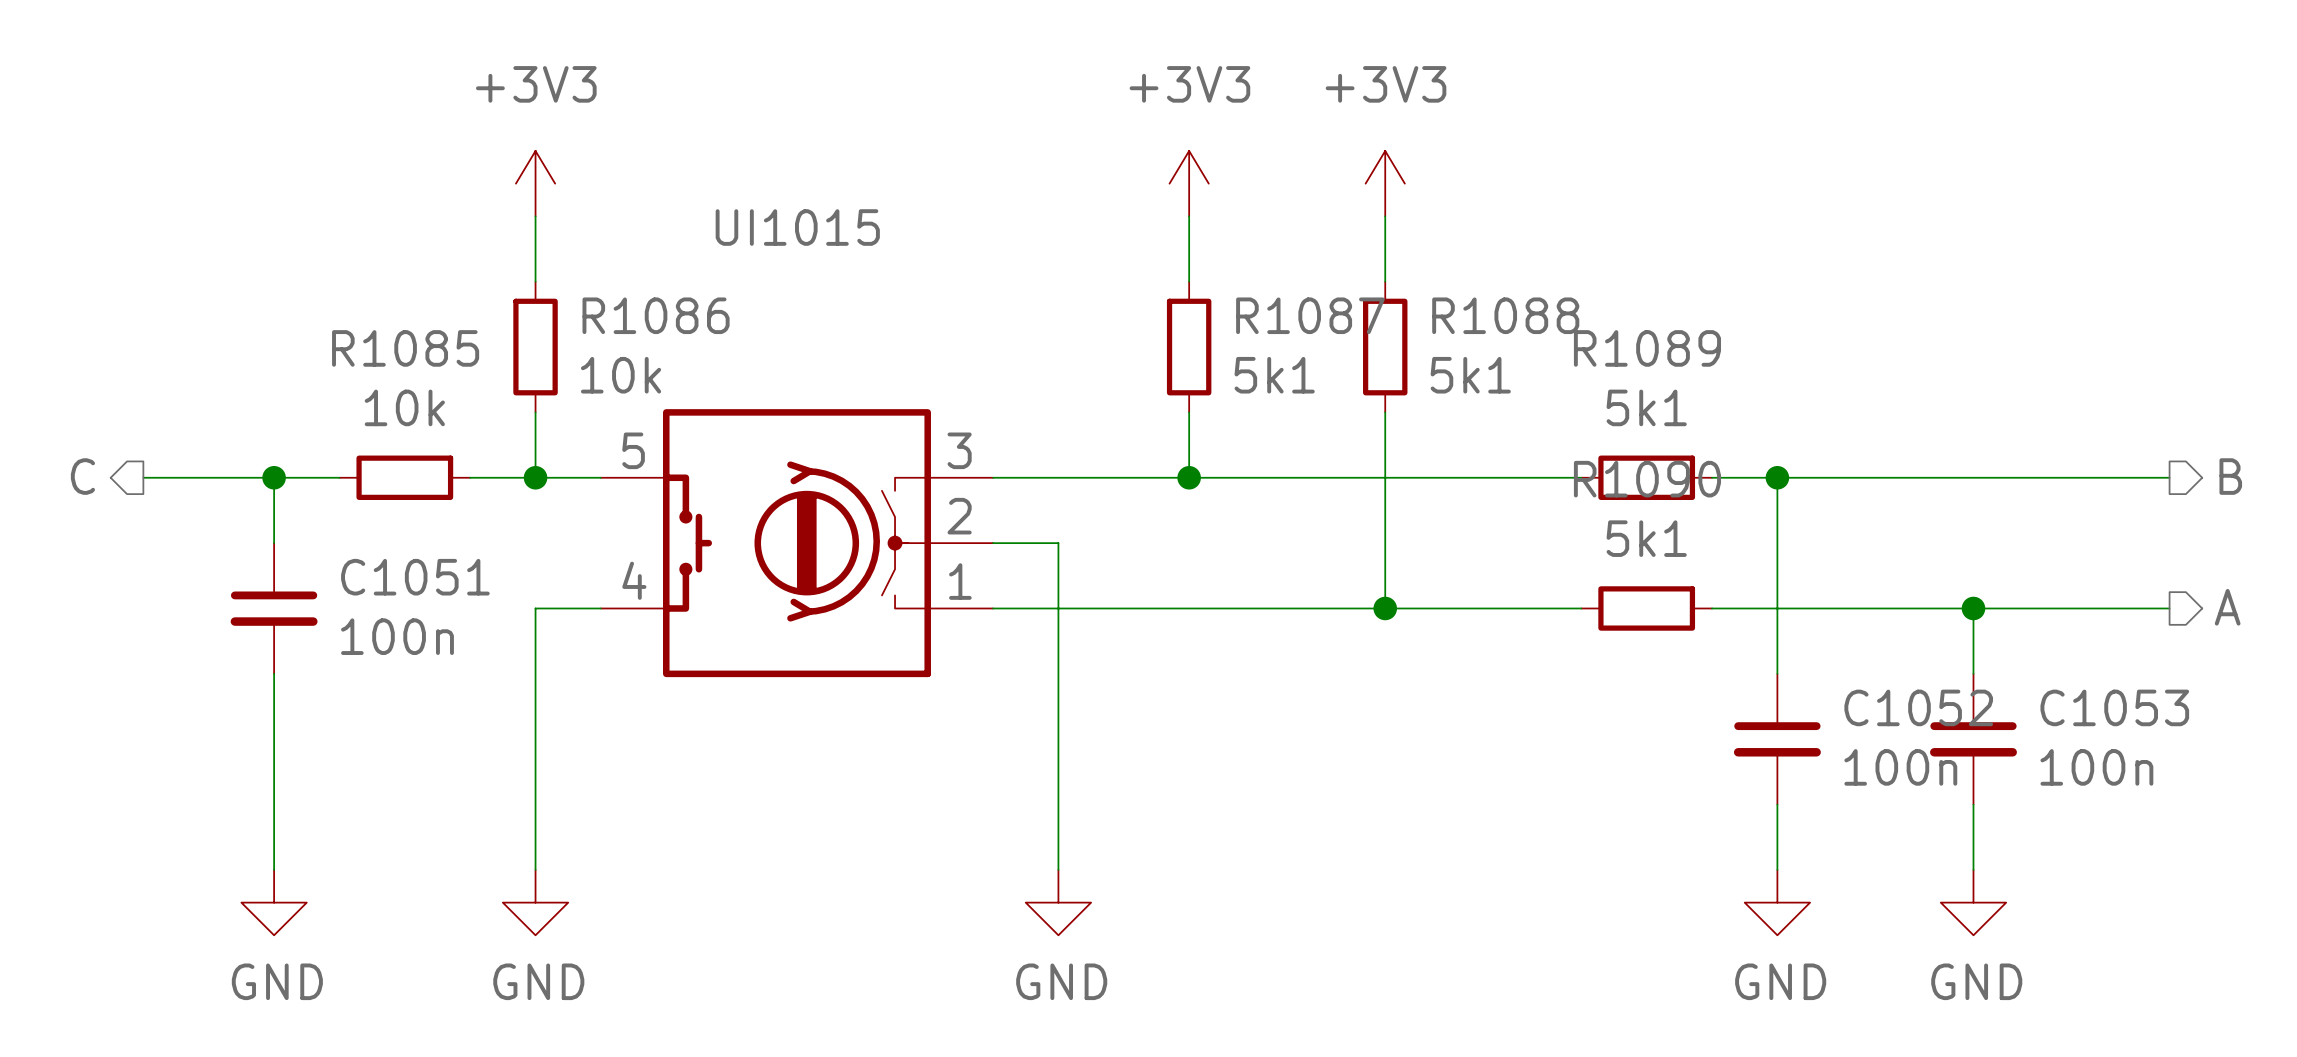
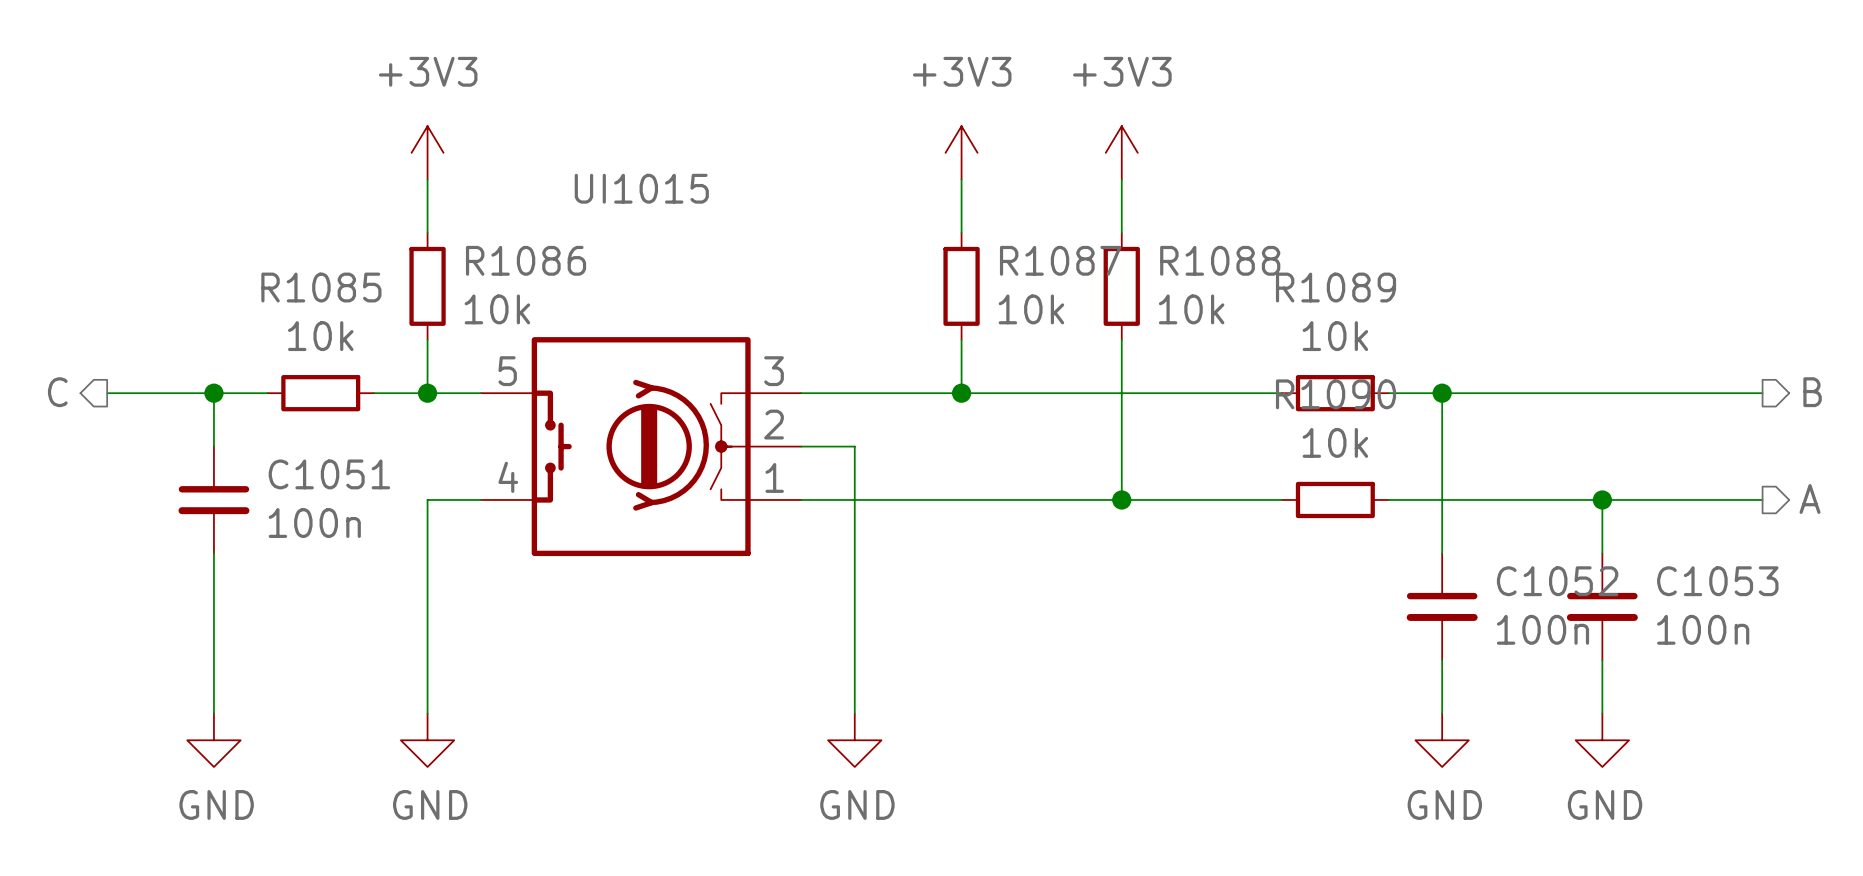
R1087 value: 5k1 (1274, 375) -> 10k (1031, 309)
R1088 value: 5k1 (1470, 375) -> 10k (1191, 309)
R1089 value: 5k1 (1646, 407) -> 10k (1335, 336)
R1090 value: 5k1 (1646, 538) -> 10k (1335, 442)

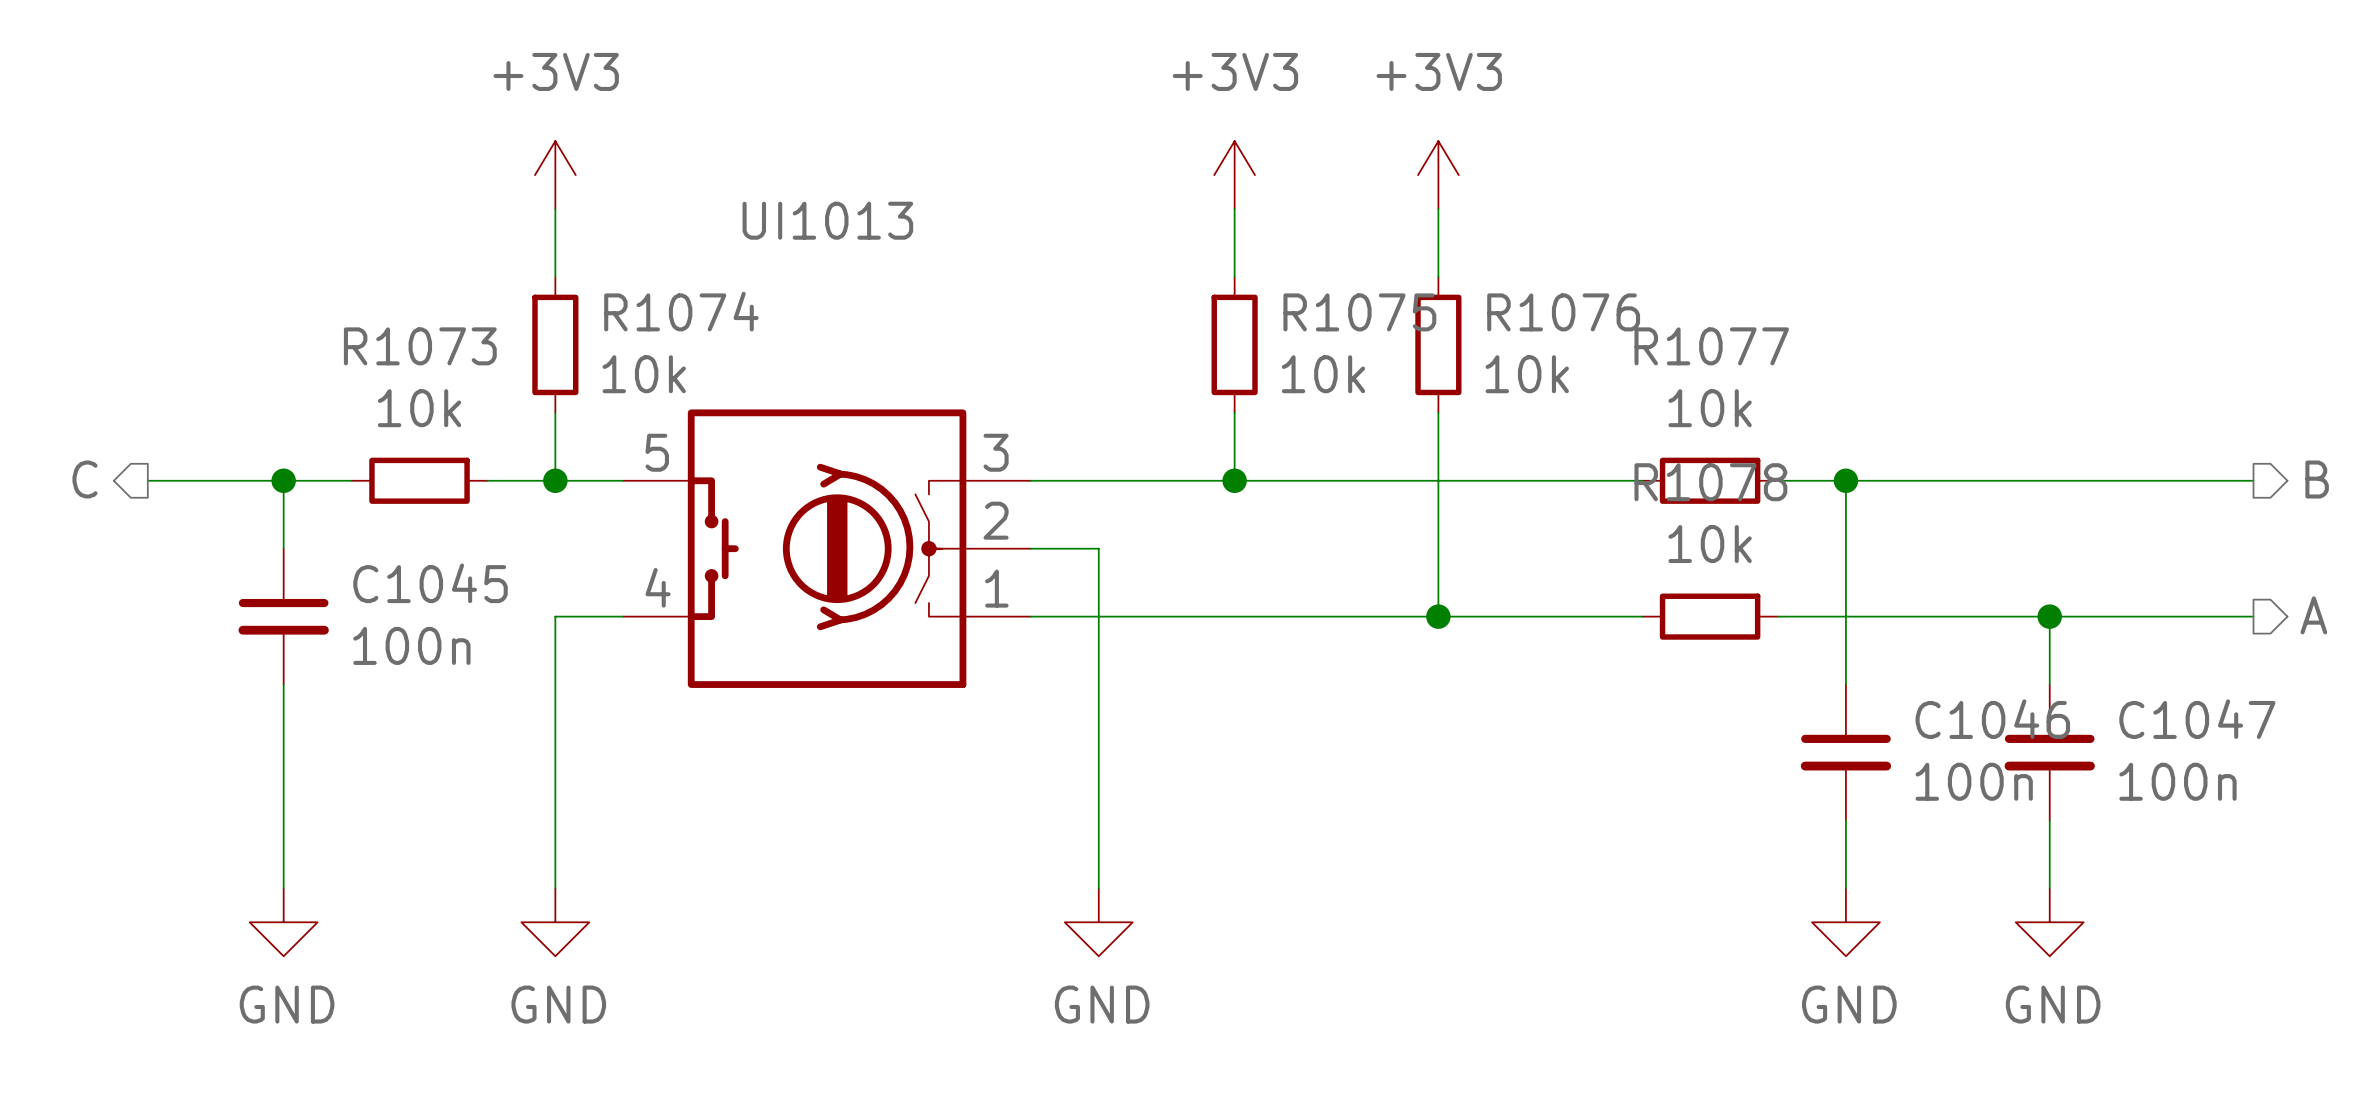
UI1015 name: UI1015 (641, 188) -> UI1013 (827, 220)
R1086 name: R1086 (526, 260) -> R1074 (681, 311)
R1087 name: R1087 (1060, 260) -> R1075 (1359, 312)
R1088 name: R1088 (1220, 260) -> R1076 (1563, 312)
R1085 name: R1085 (321, 287) -> R1073 (420, 346)
R1089 name: R1089 (1336, 287) -> R1077 (1711, 346)
R1090 name: R1090 (1336, 394) -> R1078 (1710, 482)
C1051 name: C1051 (329, 474) -> C1045 (430, 583)
C1052 name: C1052 (1557, 581) -> C1046 (1992, 719)
C1053 name: C1053 (1717, 581) -> C1047 (2197, 719)

